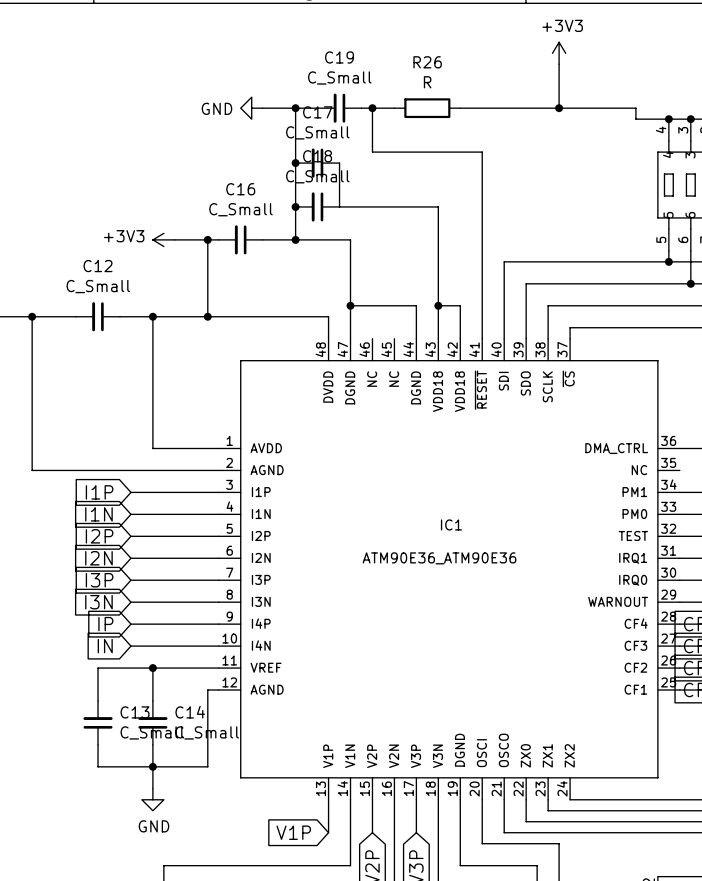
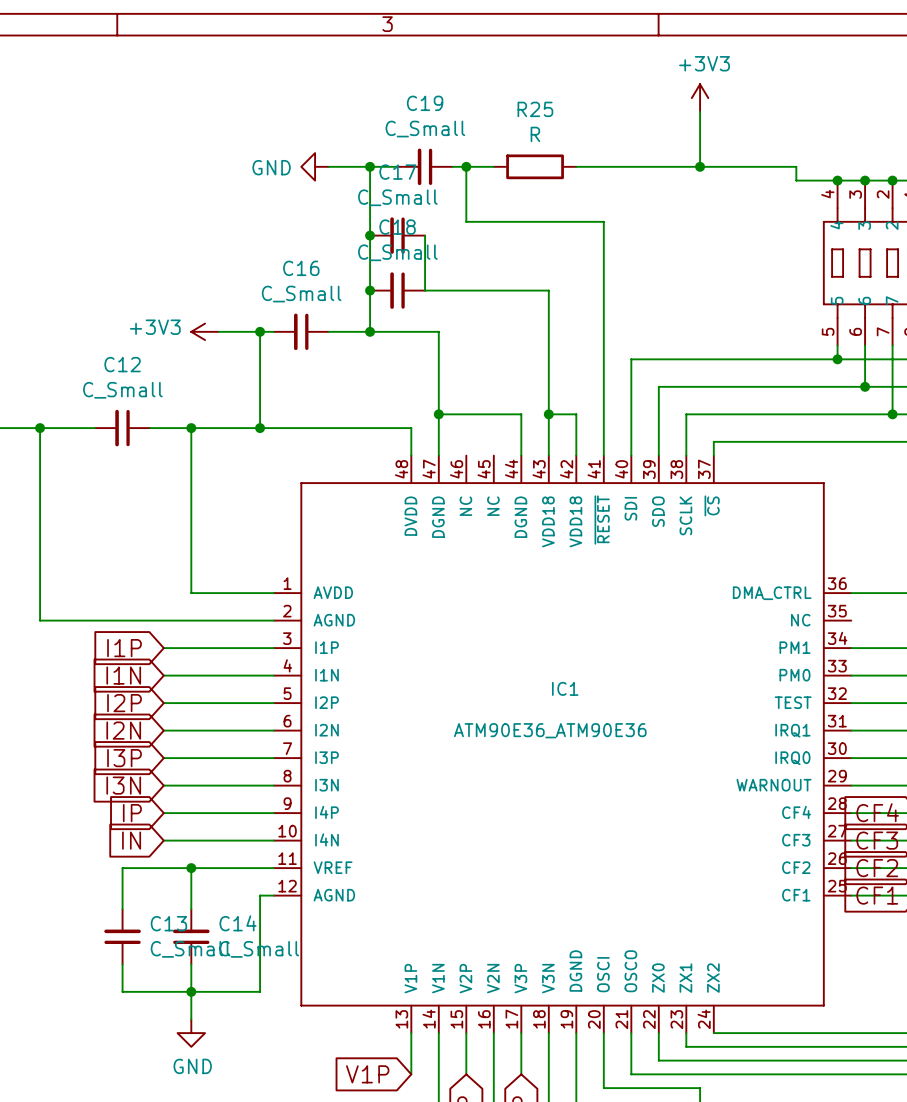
R26 name: R26 (427, 62) -> R25 (535, 109)

